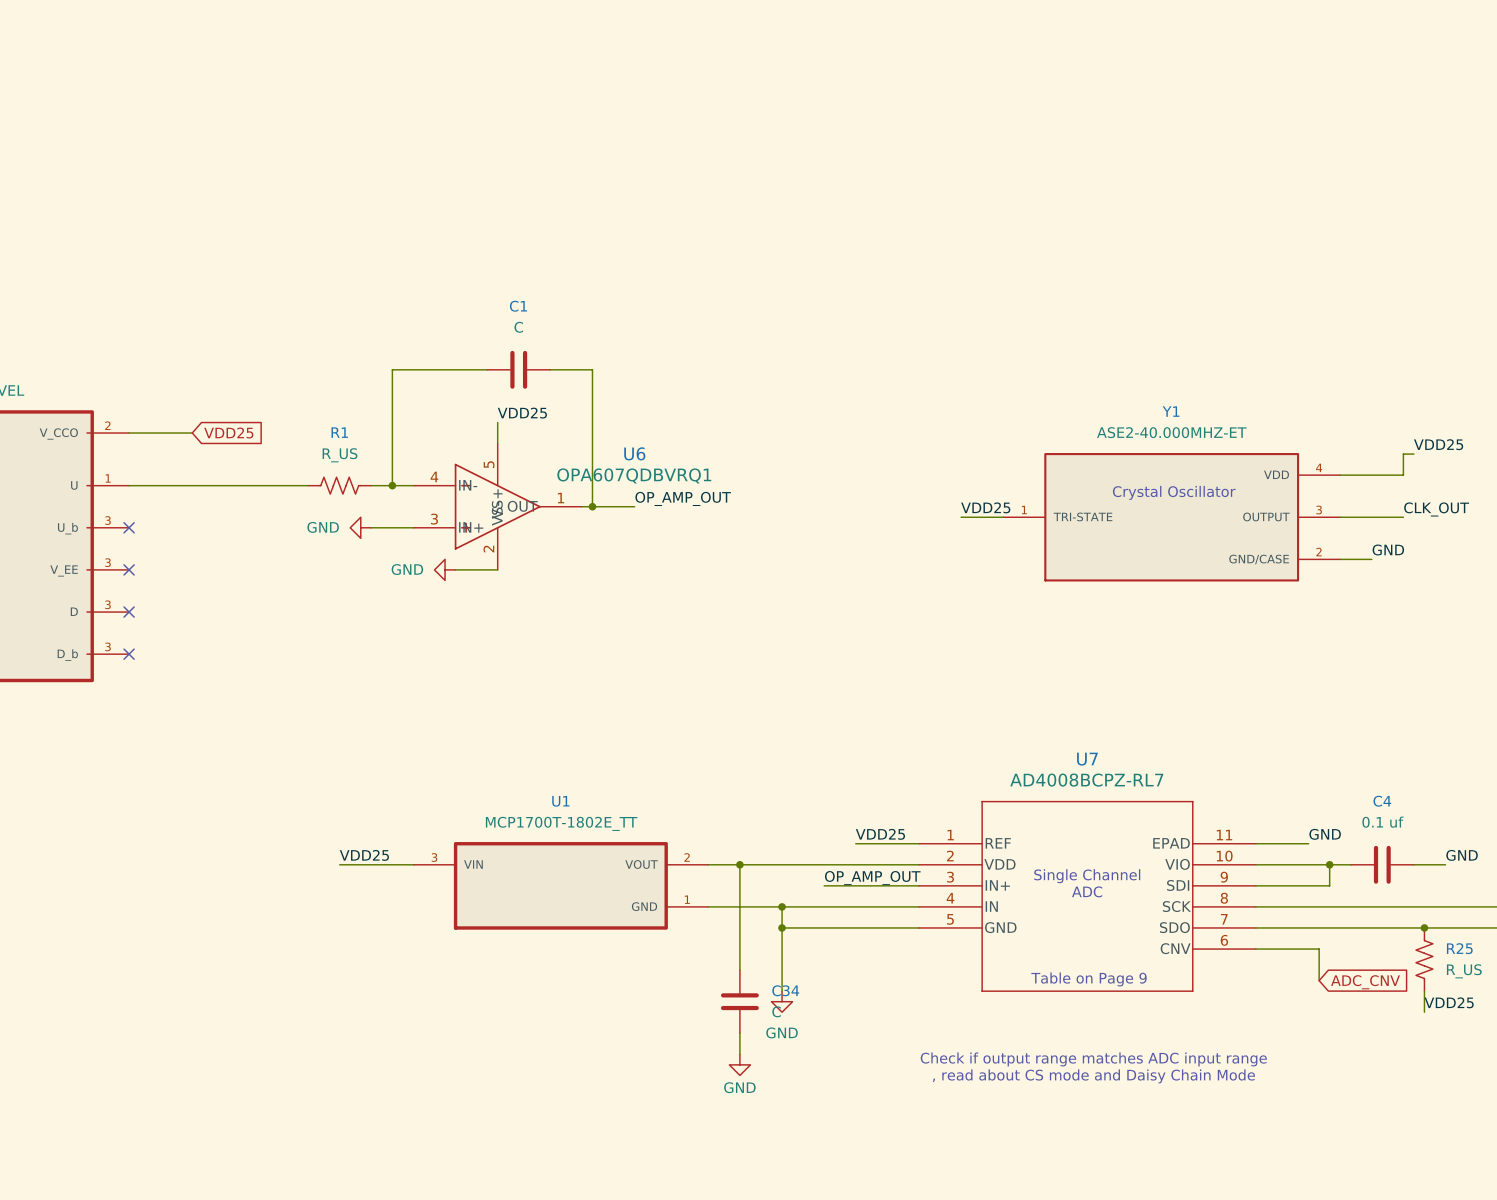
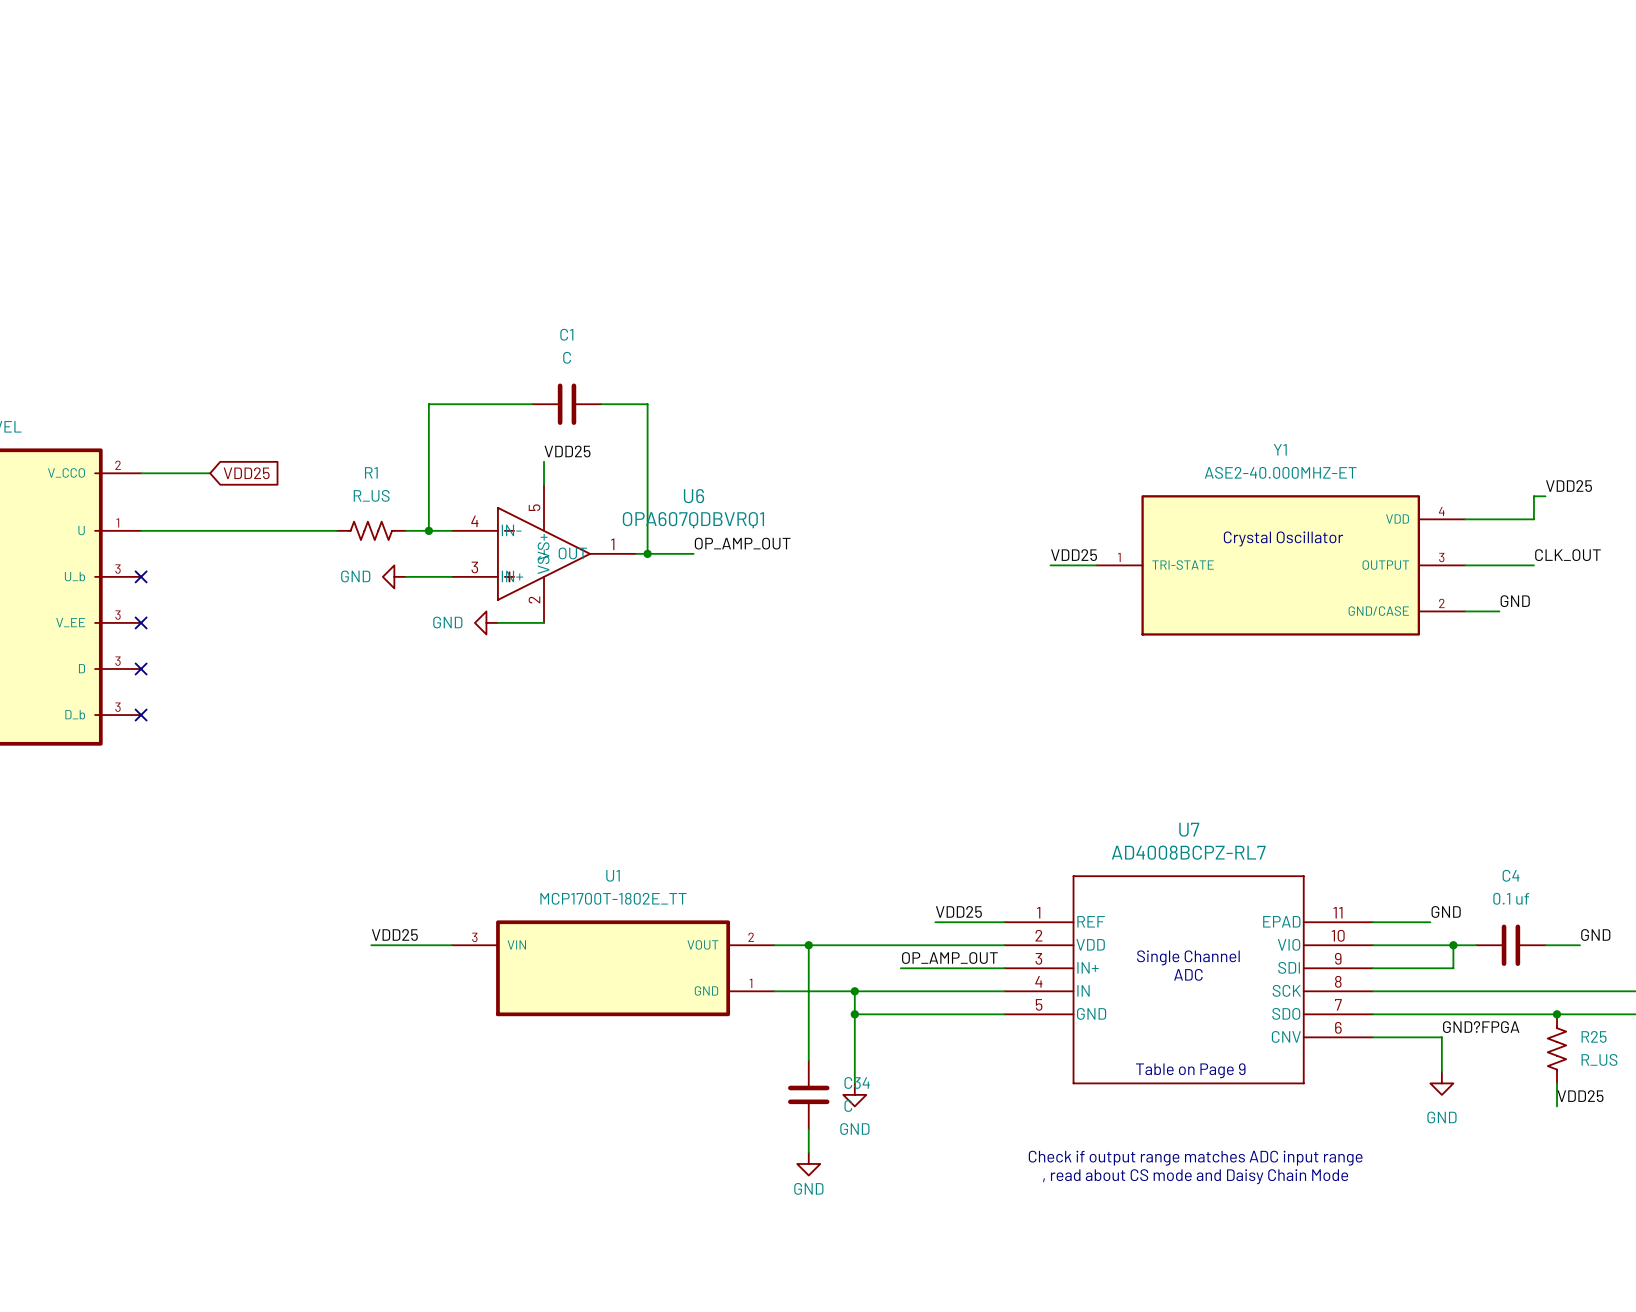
label: none -> GND?FPGA (1481, 1027)
global label: ADC_CNV (1365, 982) -> none
power symbol: none -> GND (1441, 1083)

